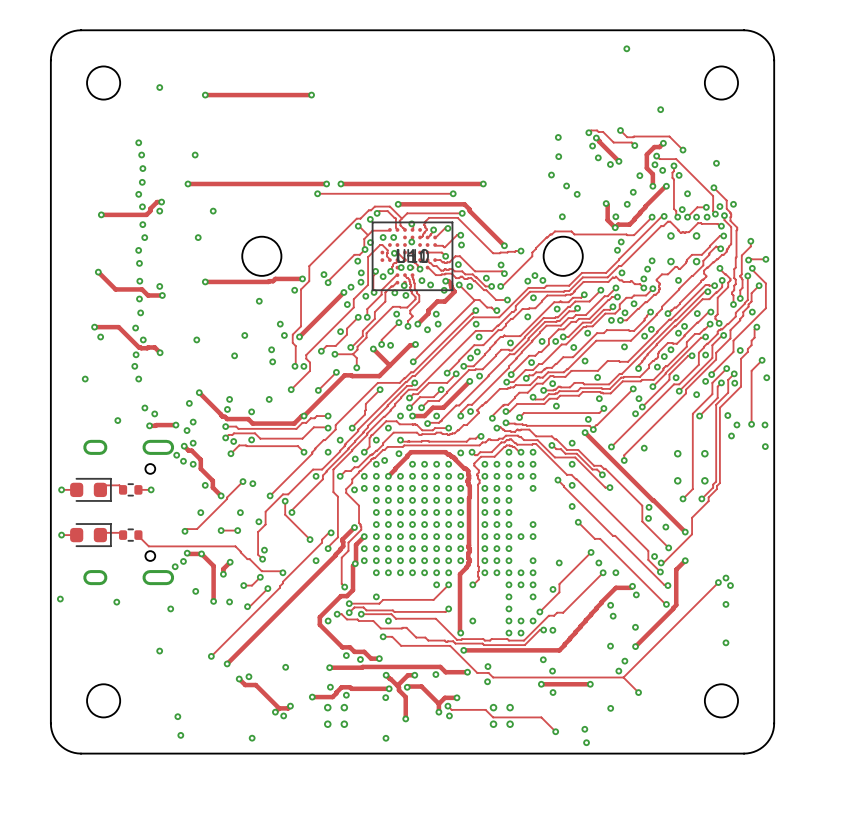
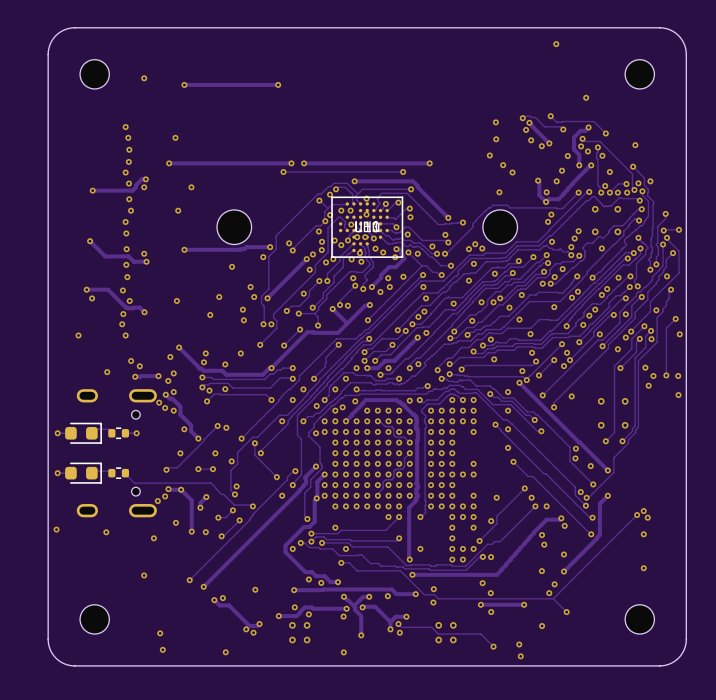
via: none -> (403, 276)
track: none -> (554, 360) (538, 375)
via: none -> (554, 360)
via: none -> (538, 375)
track: none -> (377, 421) (385, 426) (391, 426) (395, 436) (404, 437) (409, 442)
track: none -> (409, 453) (404, 458) (403, 467) (395, 469) (393, 478) (383, 481) (383, 487) (377, 495)

